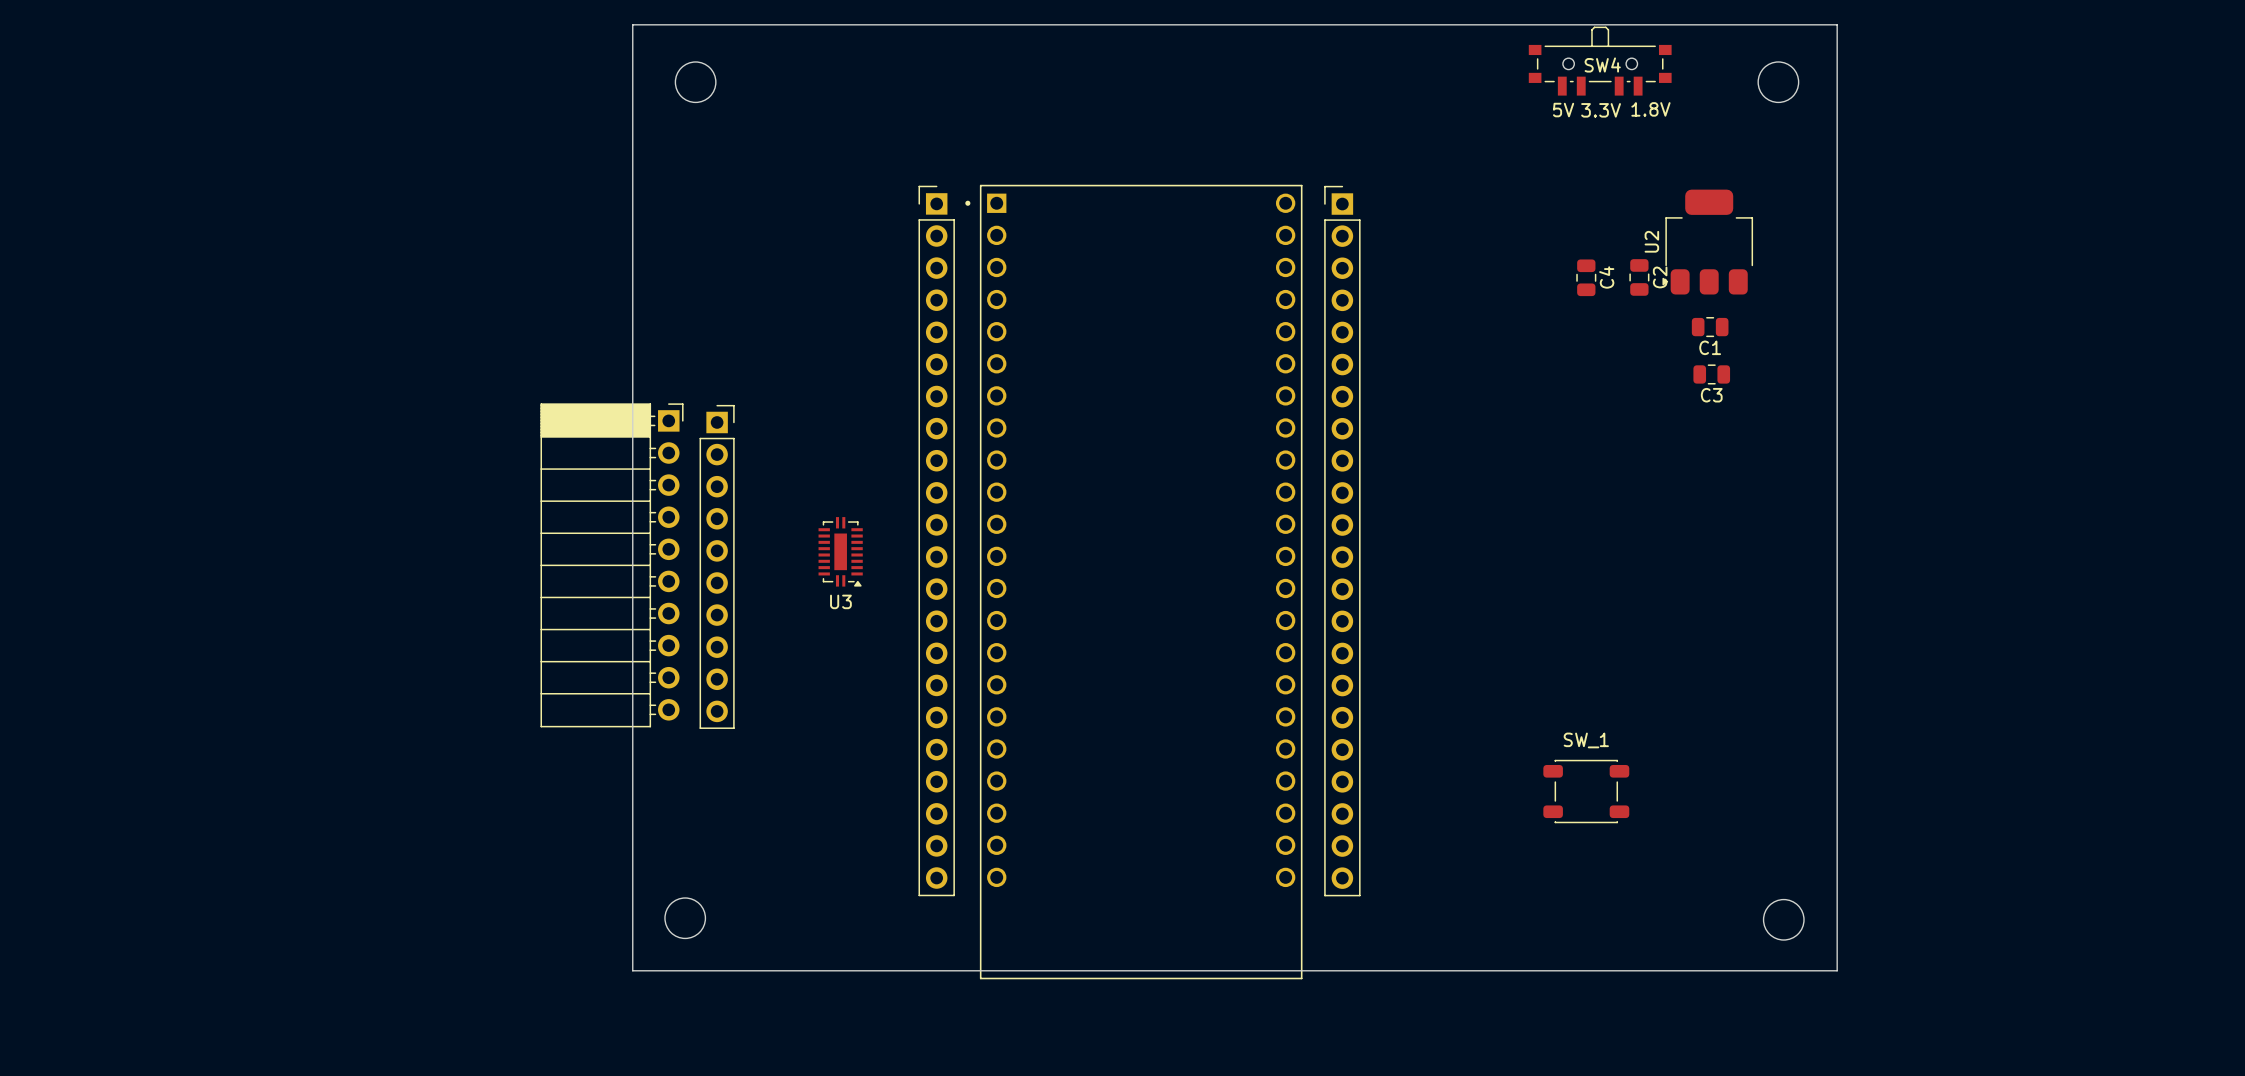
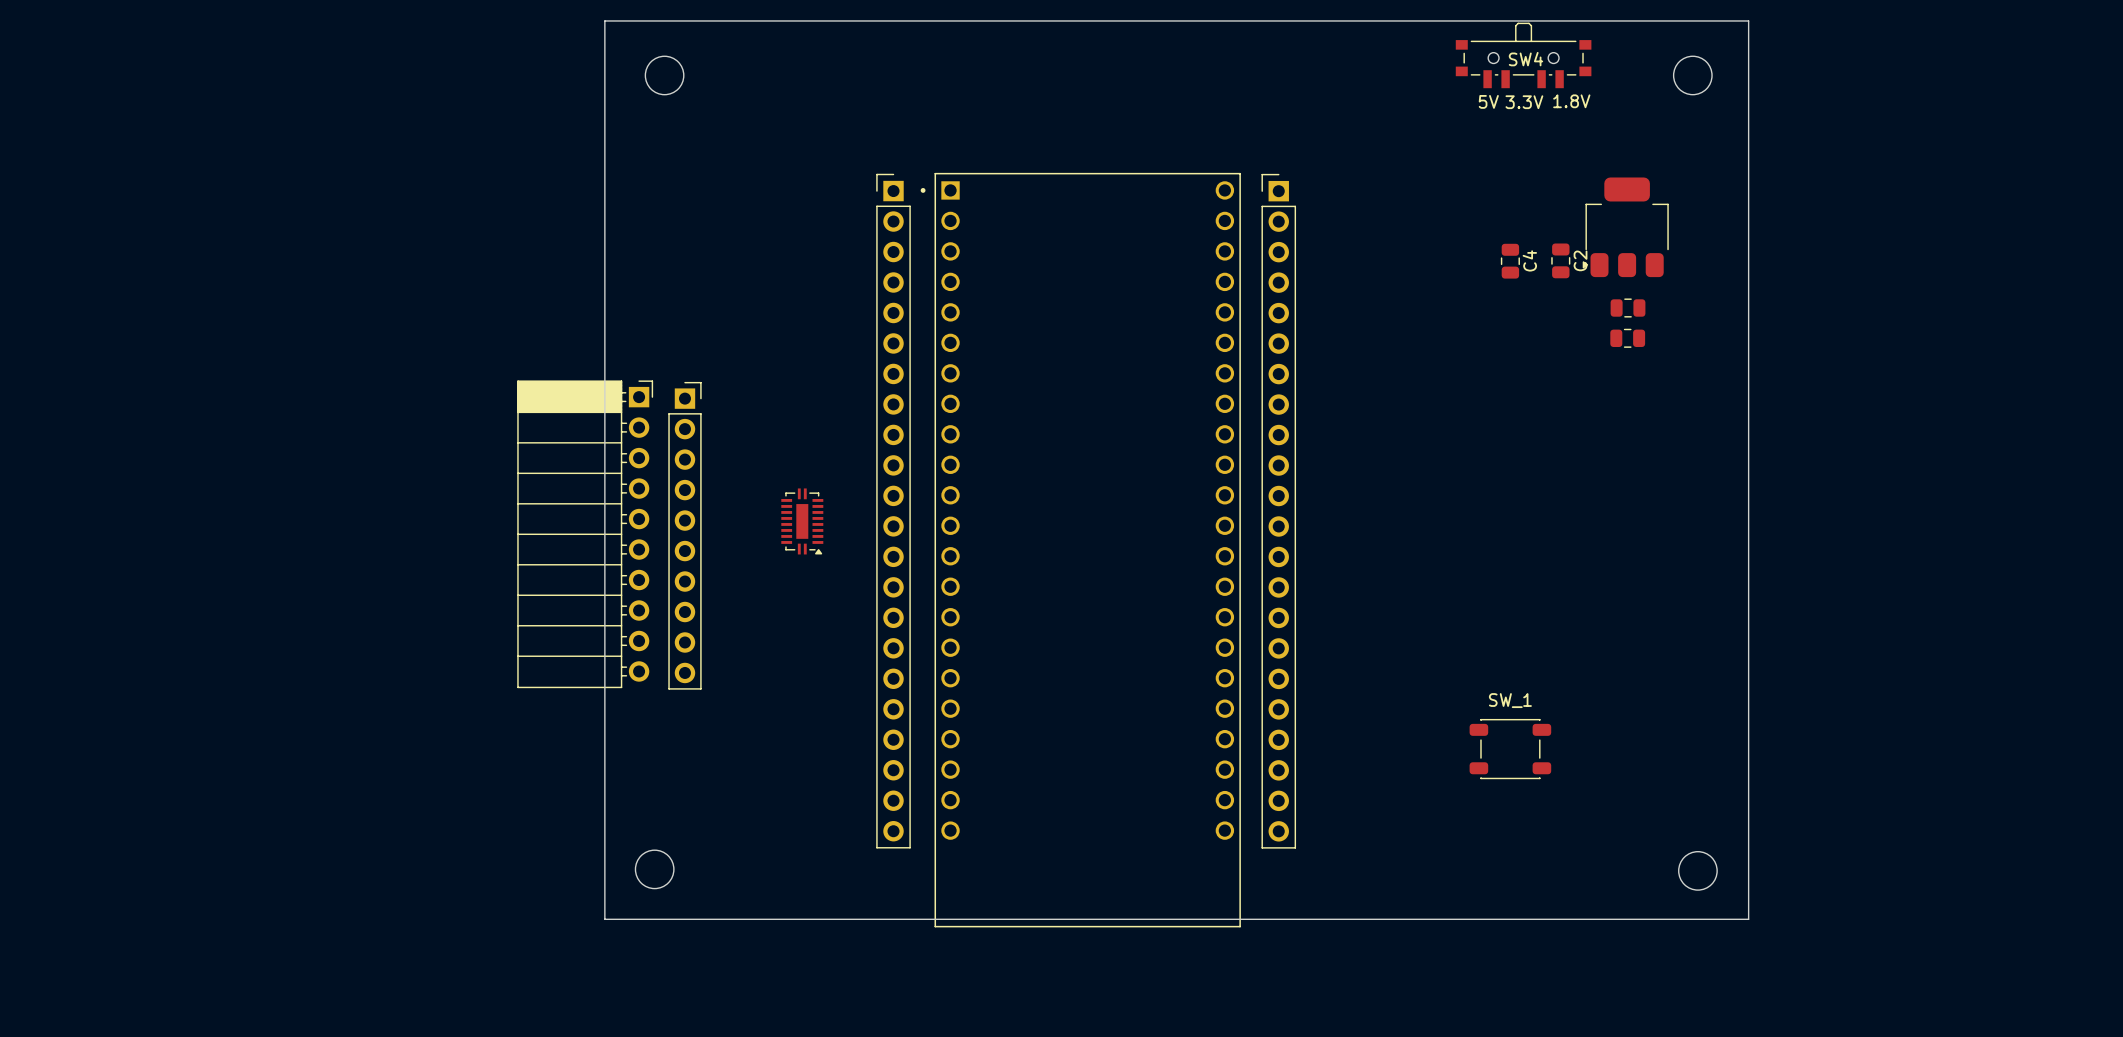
U2 name: U2 (1651, 241) -> none
C1 name: C1 (1710, 347) -> none
part: none -> (1627, 338)
C3: (1711, 374) -> none
U3 name: U3 (840, 601) -> none

